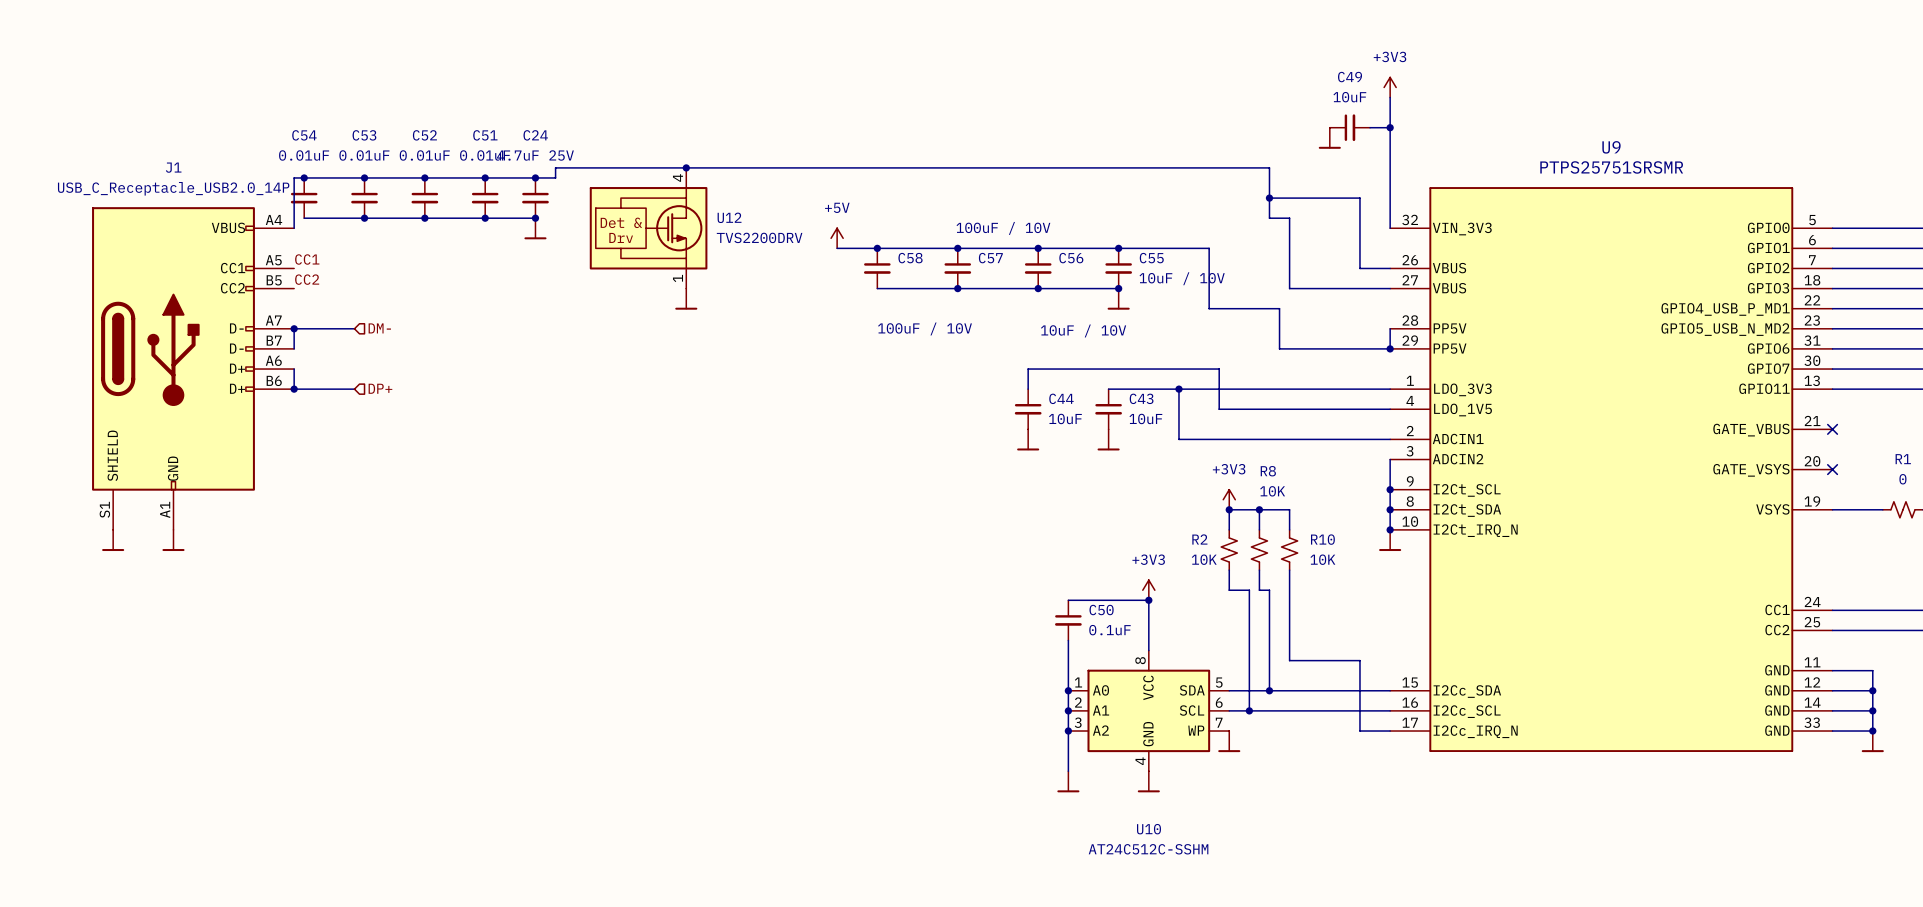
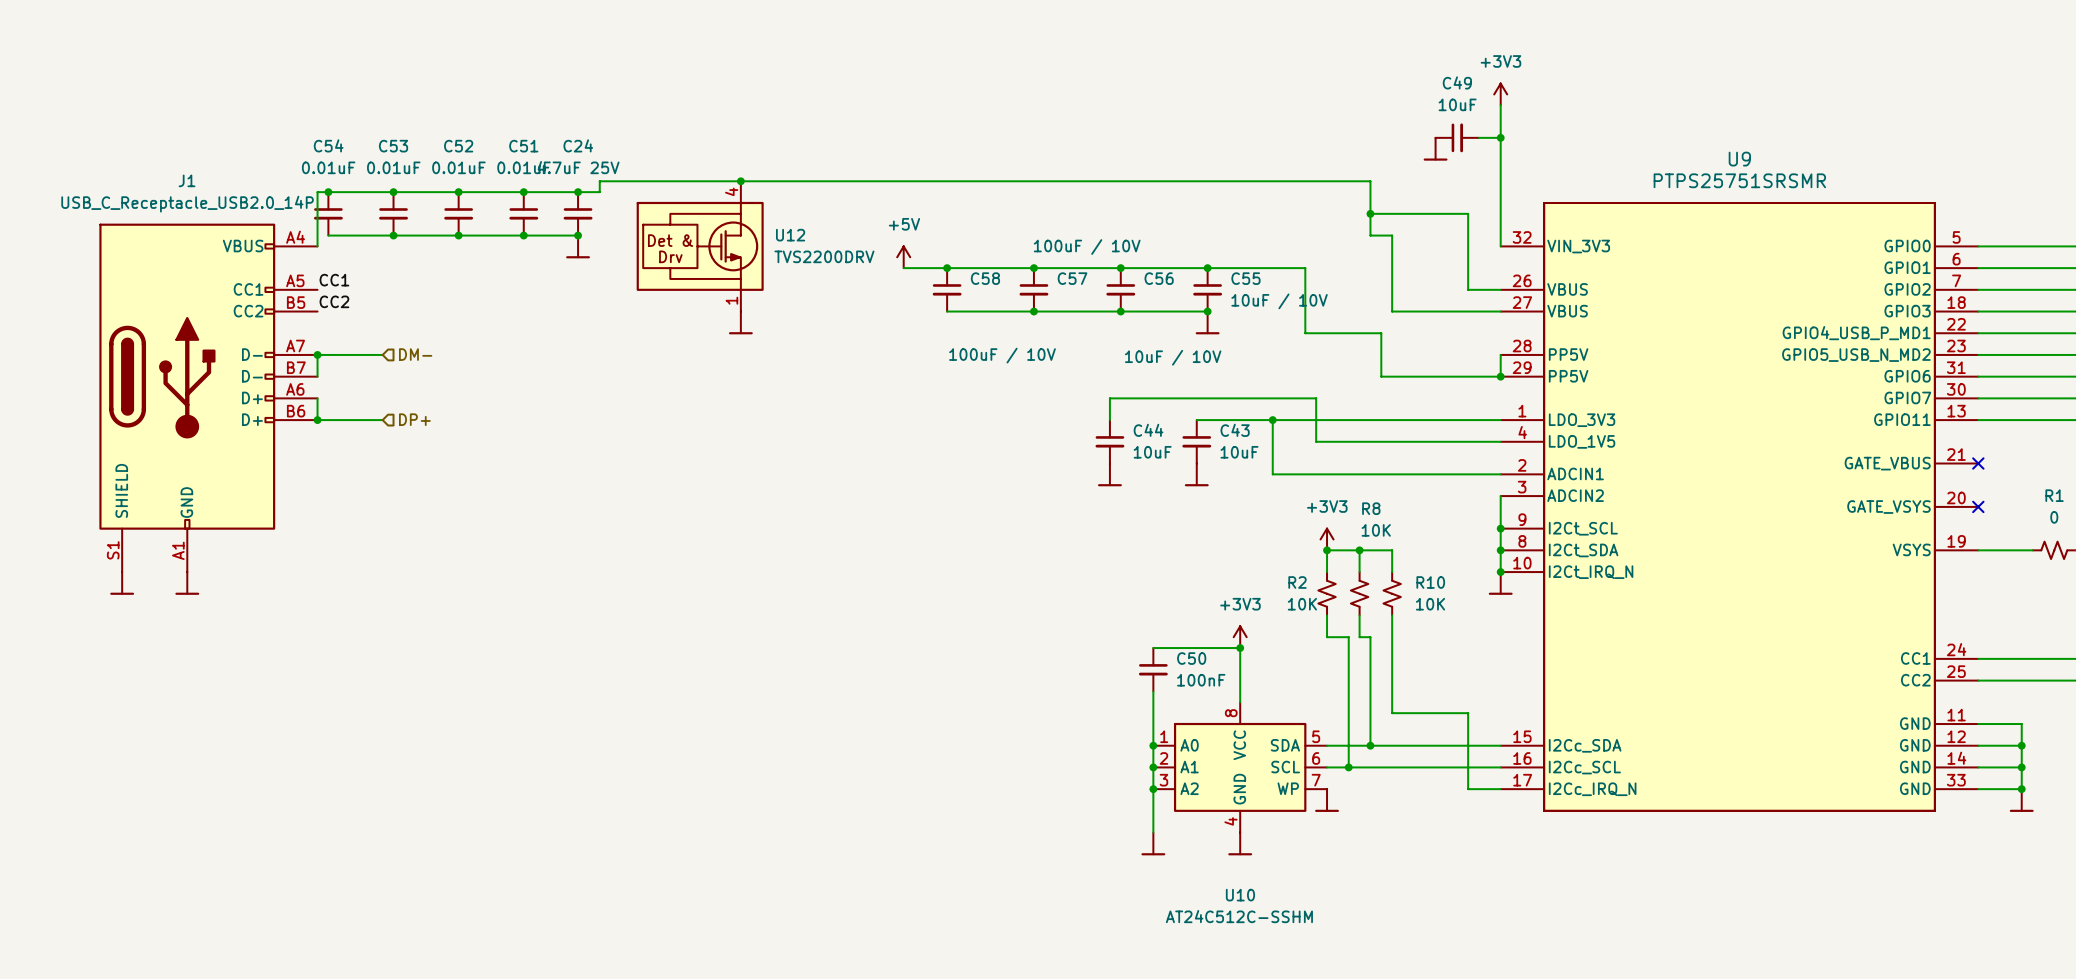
C50 value: 0.1uF (1110, 630) -> 100nF (1201, 680)

